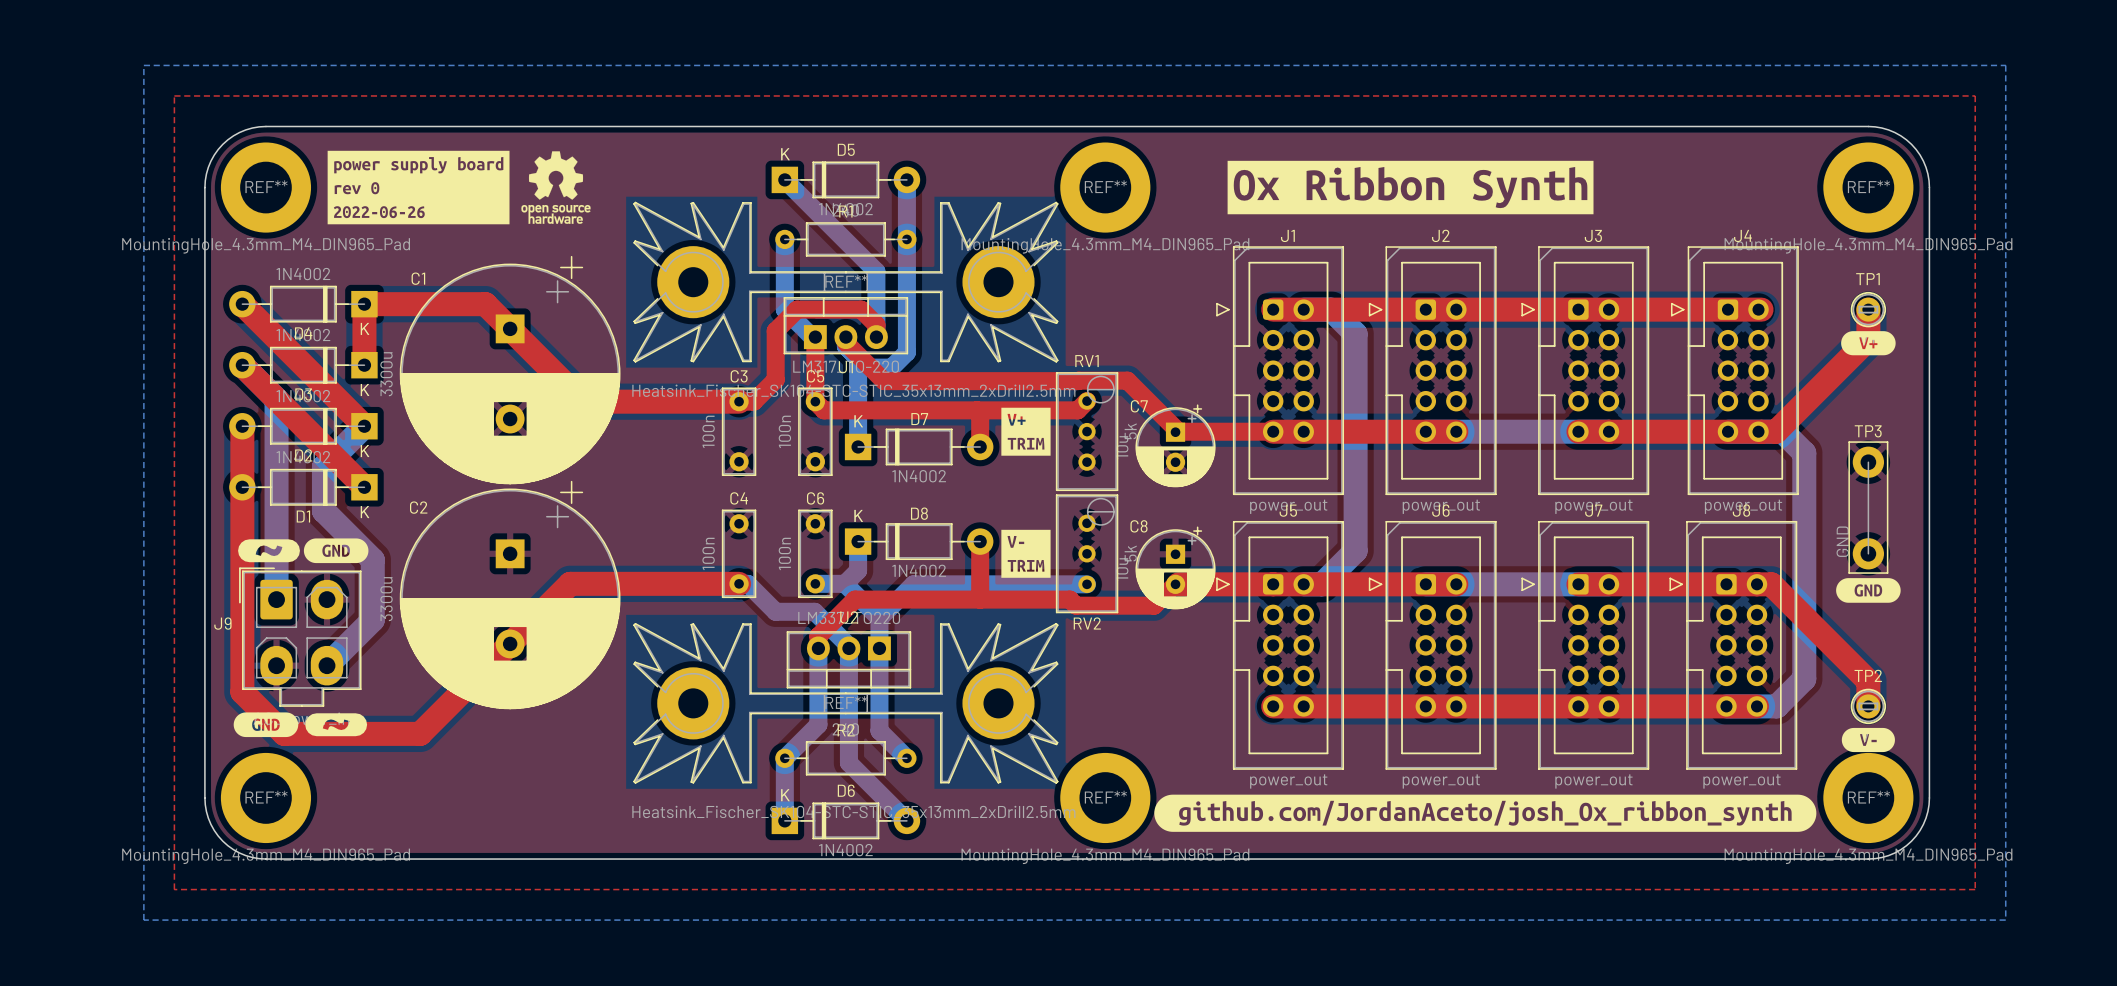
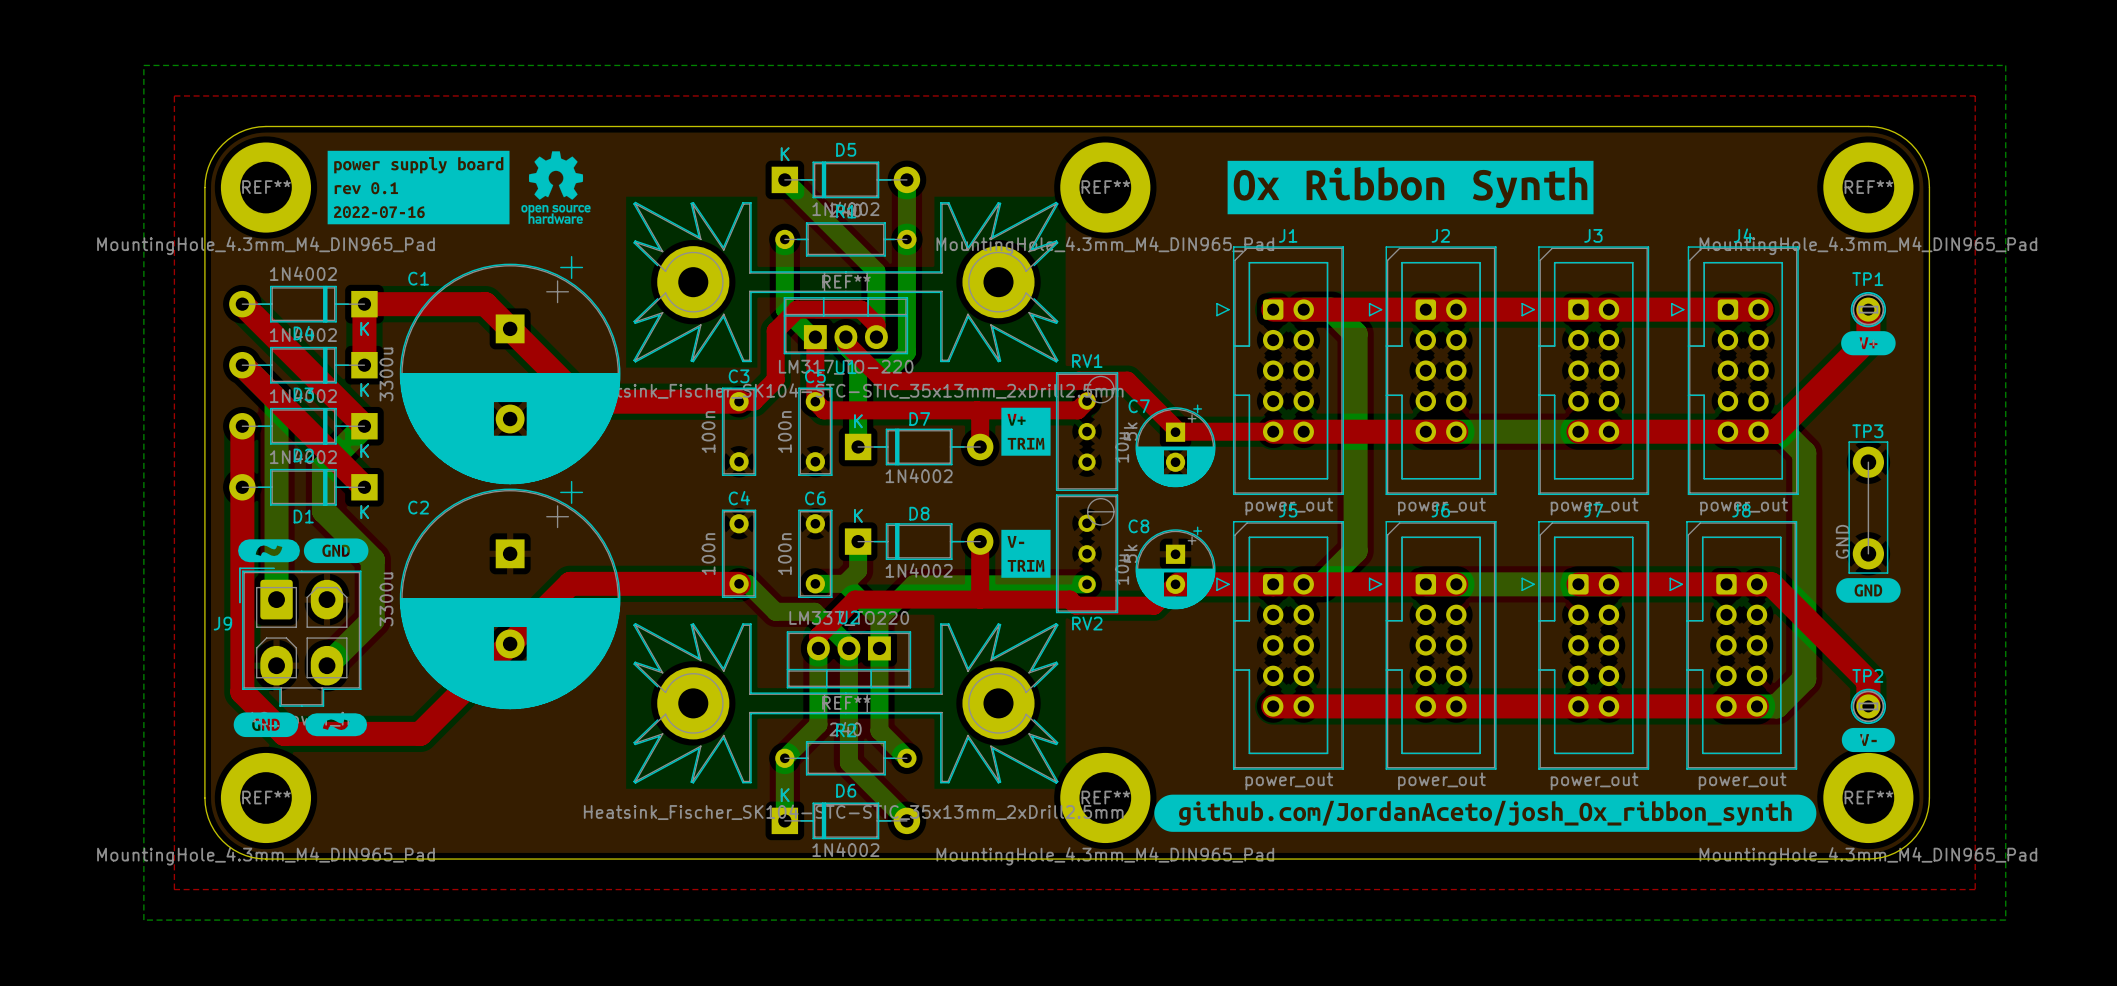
drawing shape: [327, 150, 510, 225] -> [327, 150, 510, 225]

